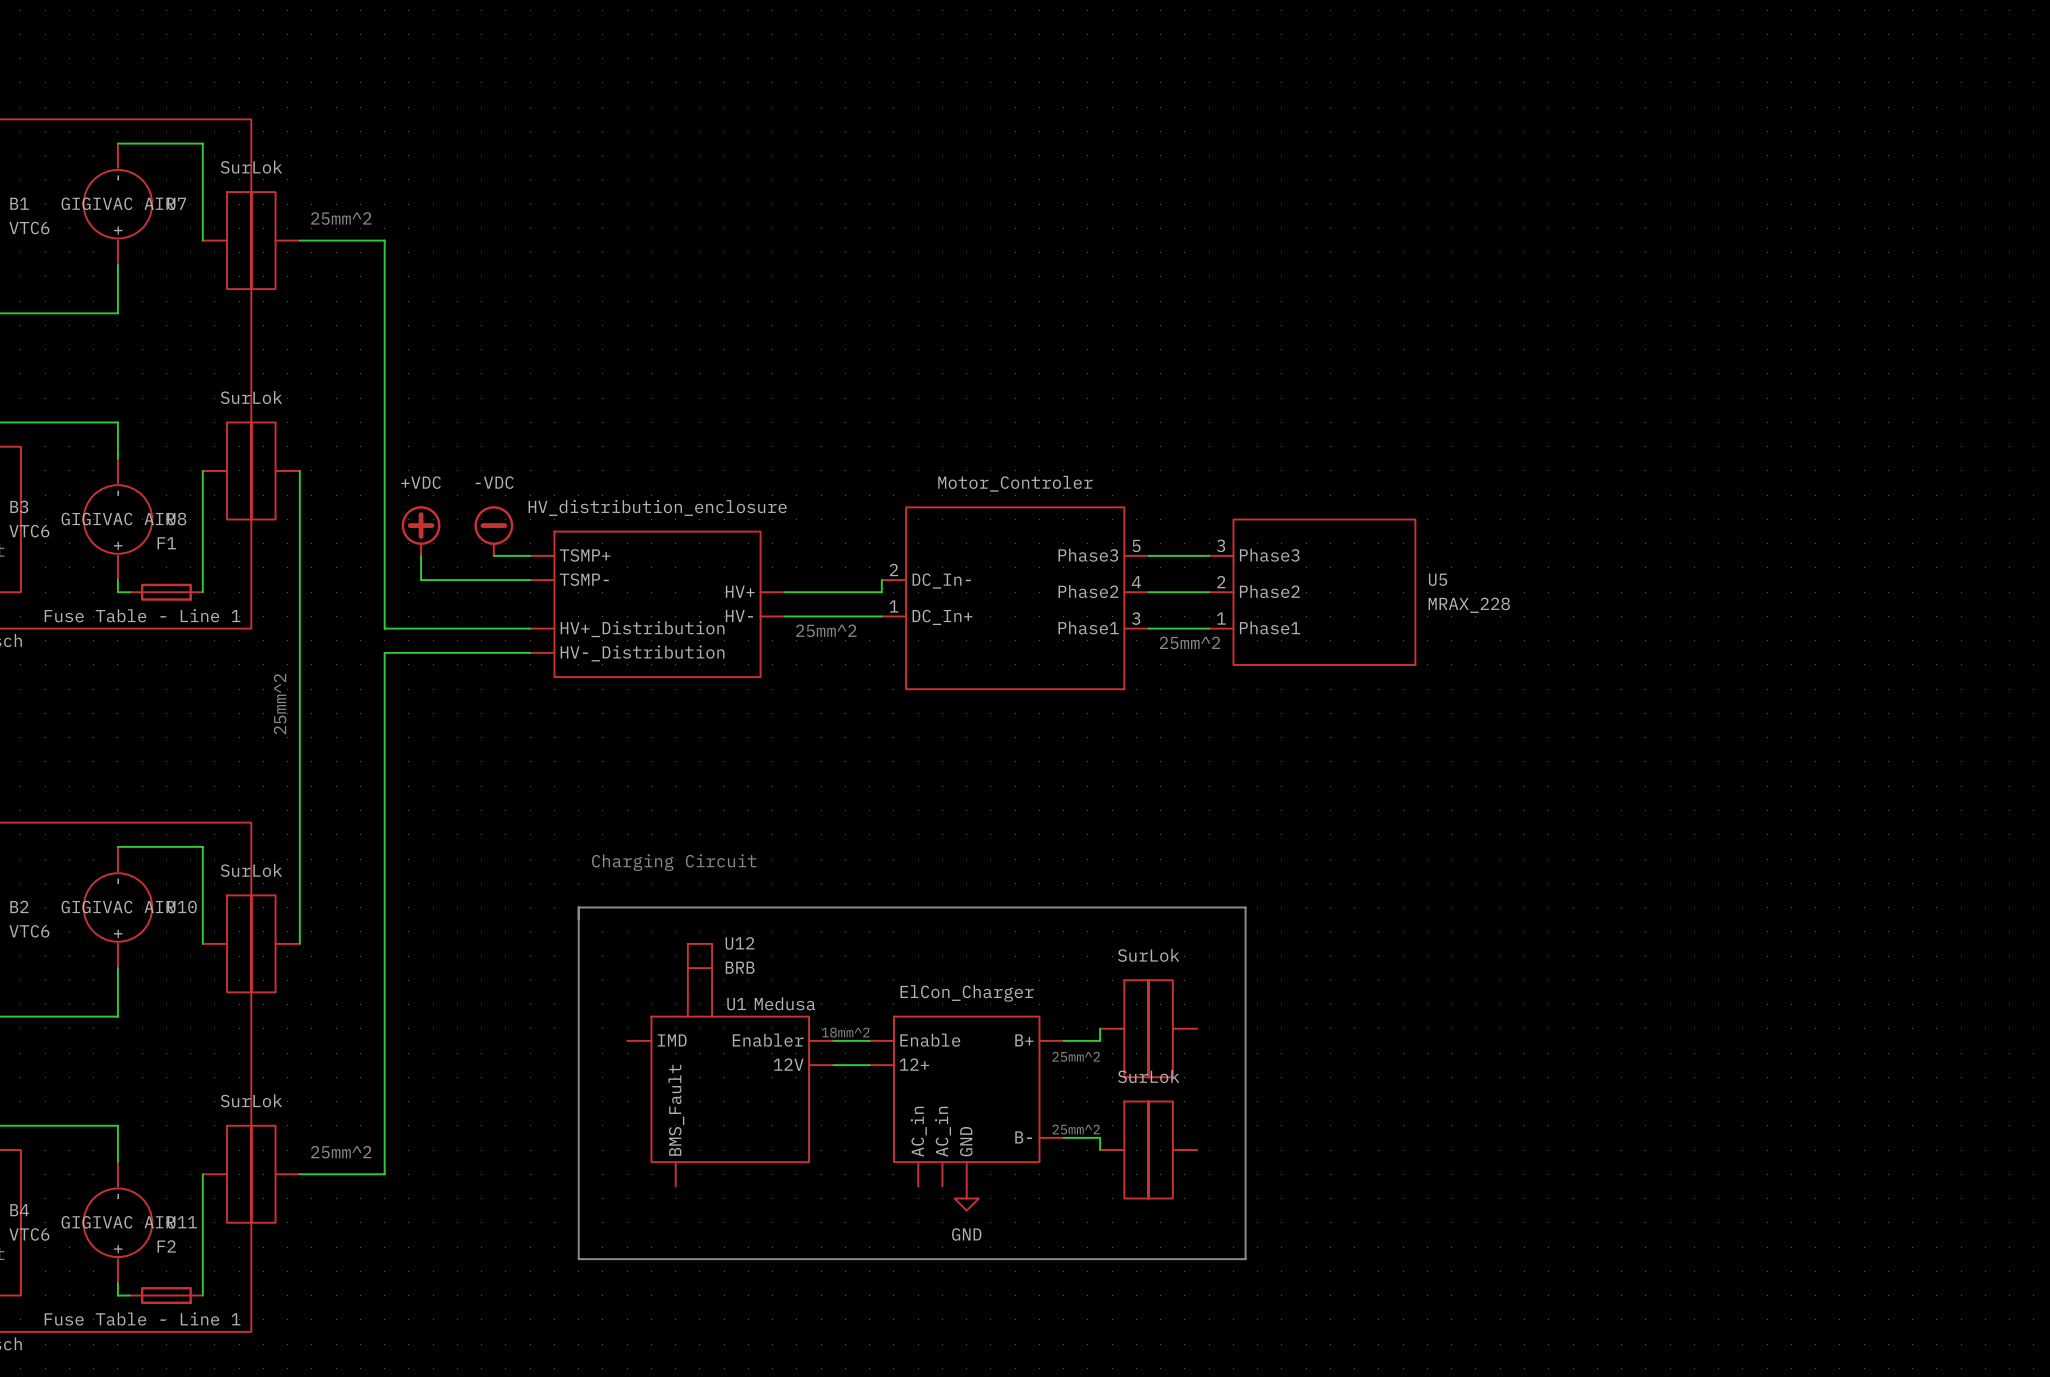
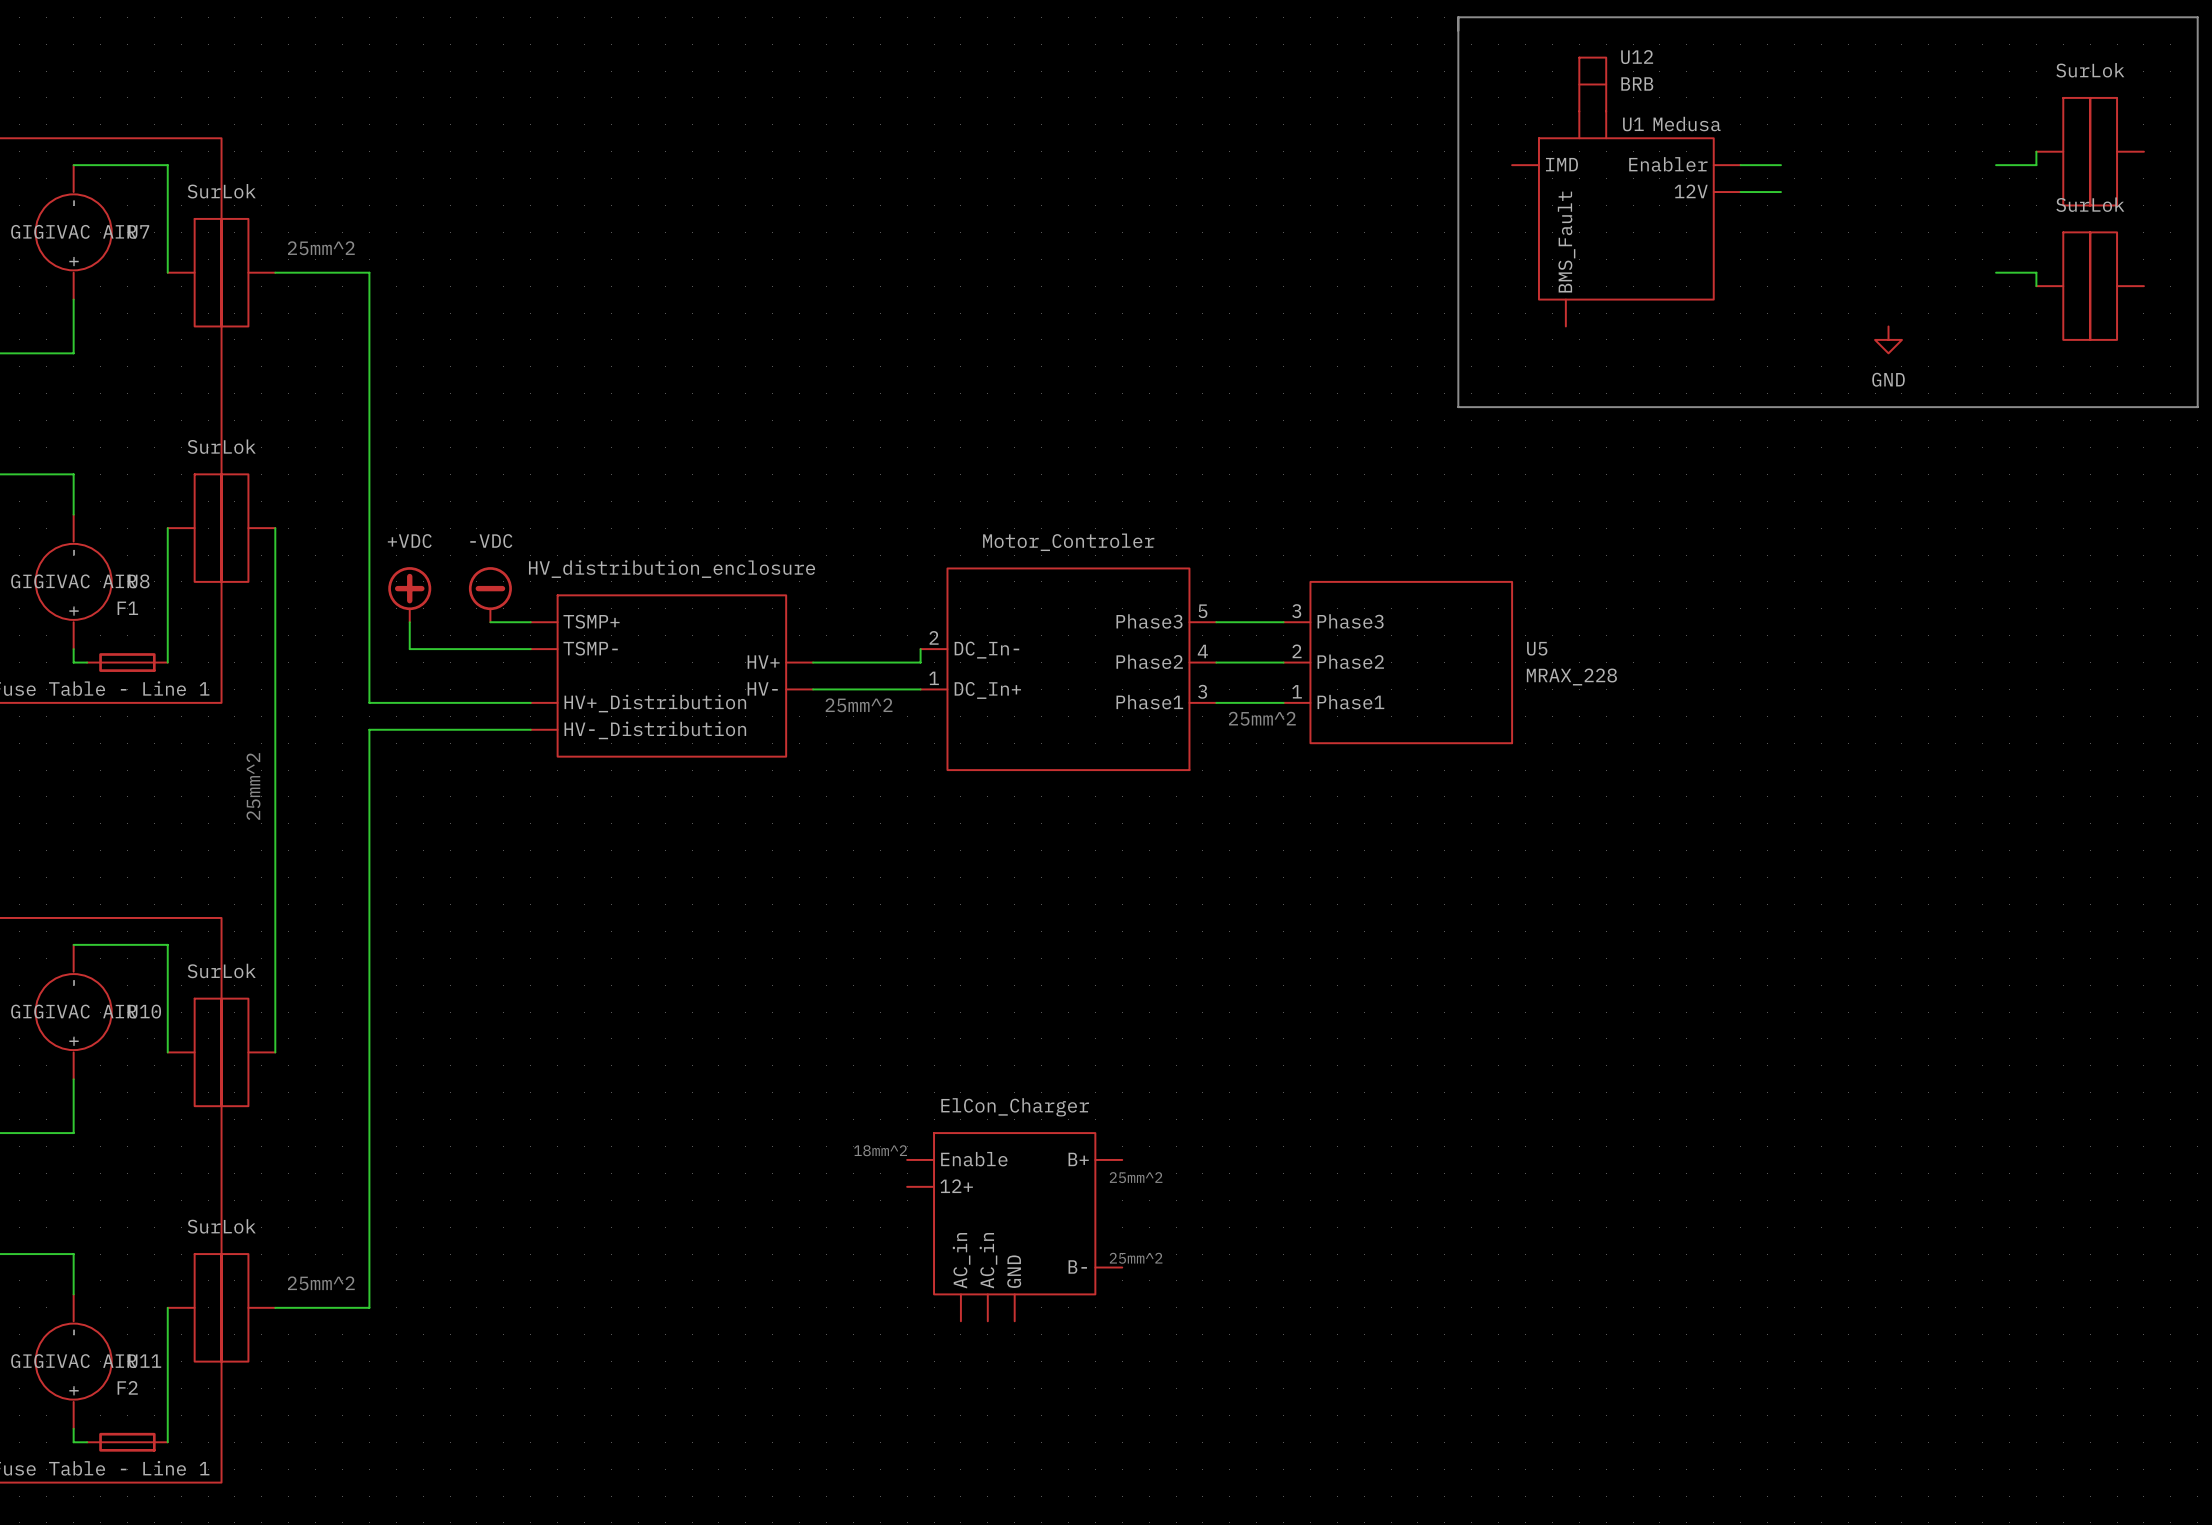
line: none -> (1458, 17) (2197, 17) (2197, 407) (1458, 407) (1458, 17)
wire: none -> (2036, 151) (2036, 165) (1996, 165)
part: none -> SurLok (2090, 151)
wire: none -> (1740, 165) (1780, 165)
wire: none -> (1740, 192) (1780, 192)
wire: none -> (1996, 272) (2036, 272) (2036, 286)
part: none -> SurLok (2090, 286)
power symbol: none -> GND (1888, 339)
text: Charging Circuit (674, 862) -> none
line: (578, 907) (1245, 907) (1245, 1259) (578, 1259) (578, 907) -> none
U12 position: (699, 968) -> (1592, 84)
wire: (1100, 1028) (1100, 1040) (1063, 1040) -> none
part: SurLok (1148, 1028) -> none
wire: (833, 1040) (869, 1040) -> none
wire: (833, 1065) (869, 1065) -> none
U1 position: (730, 1089) -> (1626, 218)
wire: (1063, 1137) (1100, 1137) (1100, 1150) -> none
part: SurLok (1148, 1150) -> none
power symbol: GND (966, 1198) -> none

